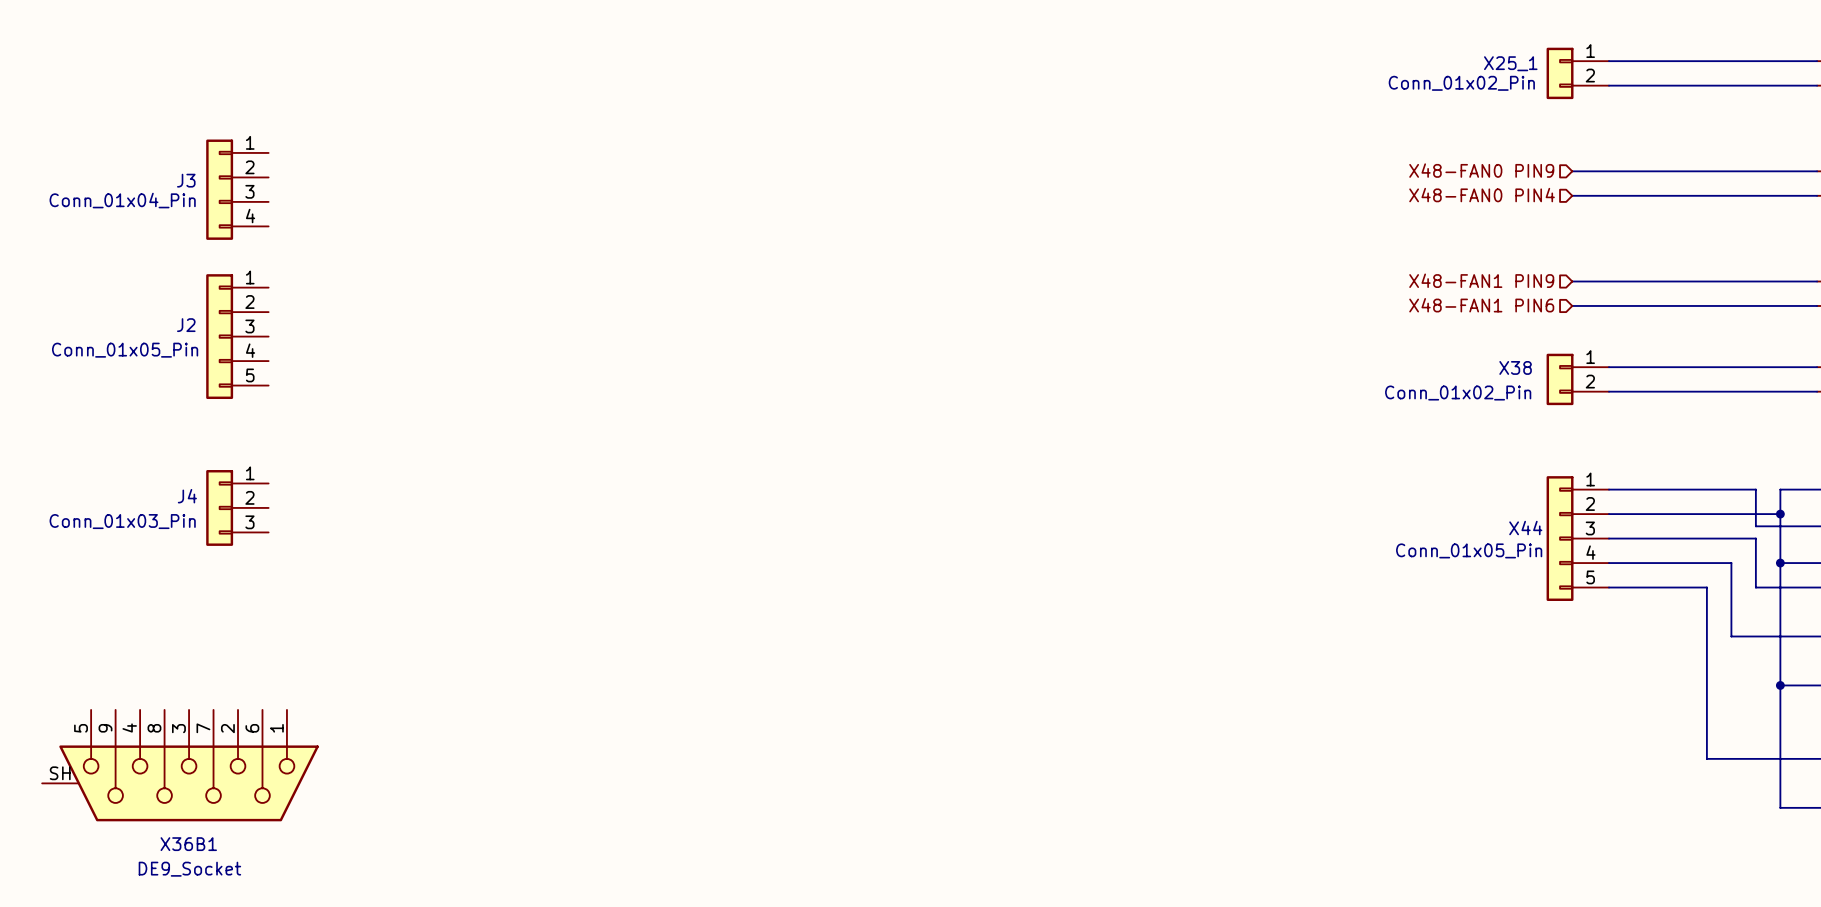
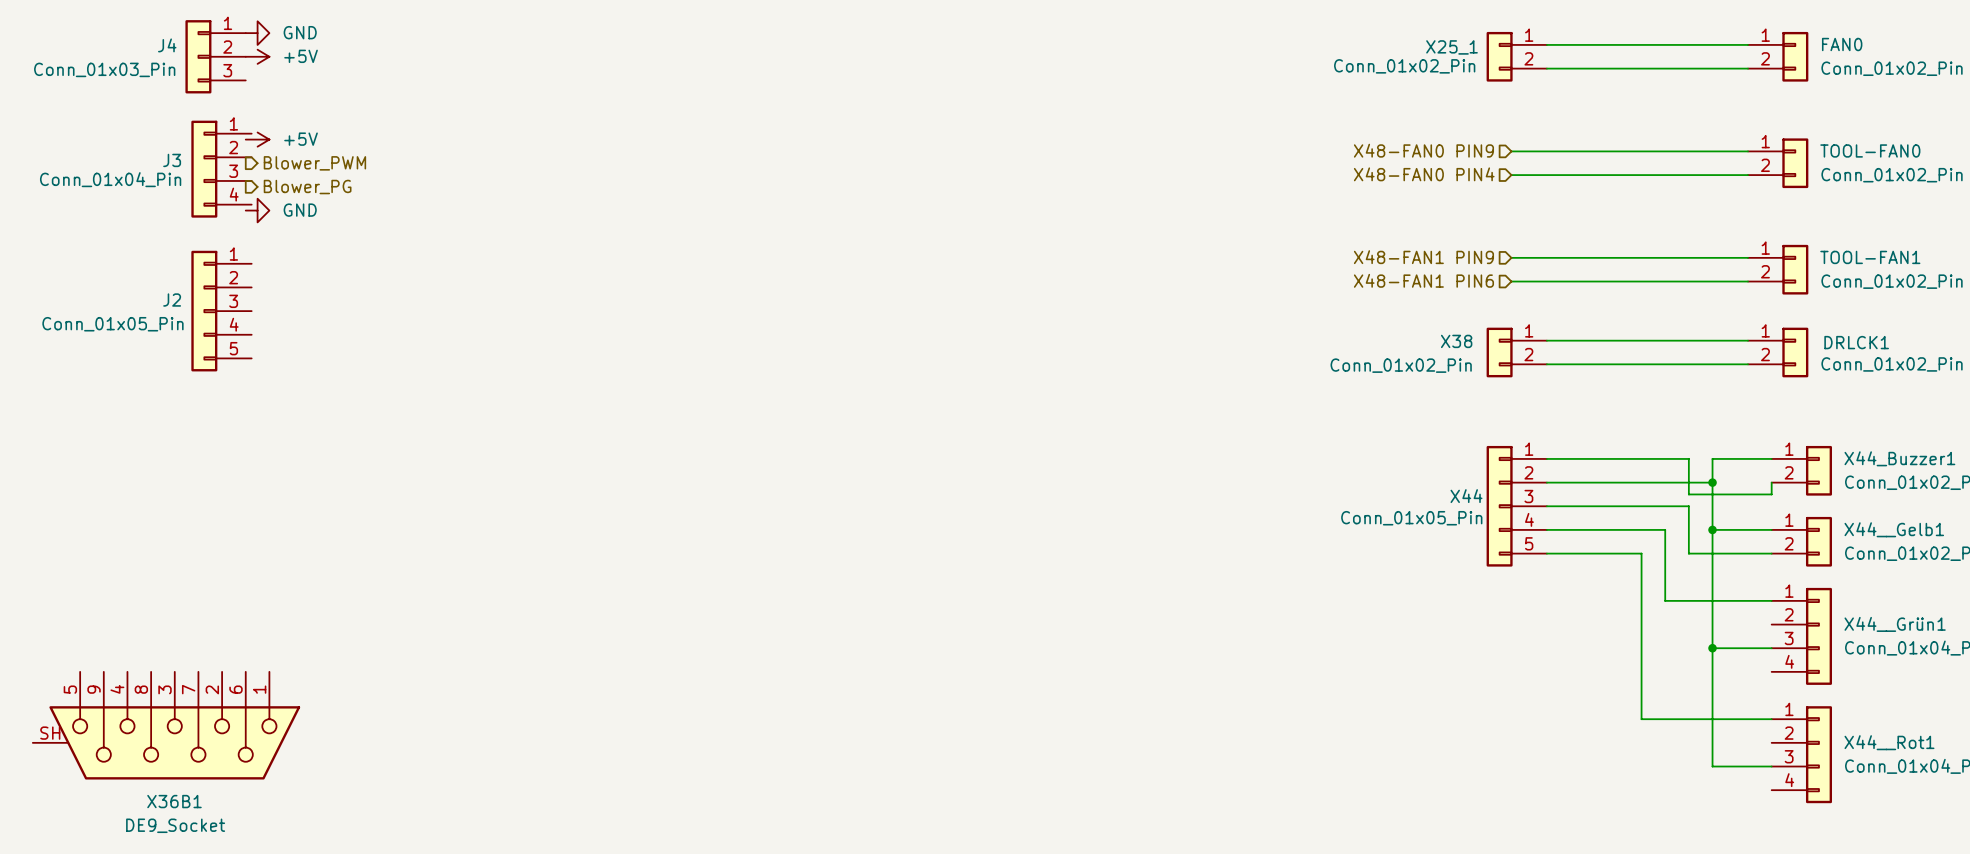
power symbol: none -> GND (257, 33)
power symbol: none -> +5V (257, 56)
power symbol: none -> +5V (257, 139)
hierarchical label: none -> Blower_PWM (314, 163)
hierarchical label: none -> Blower_PG (307, 187)
power symbol: none -> GND (257, 210)
J4 position: (237, 507) -> (215, 56)

